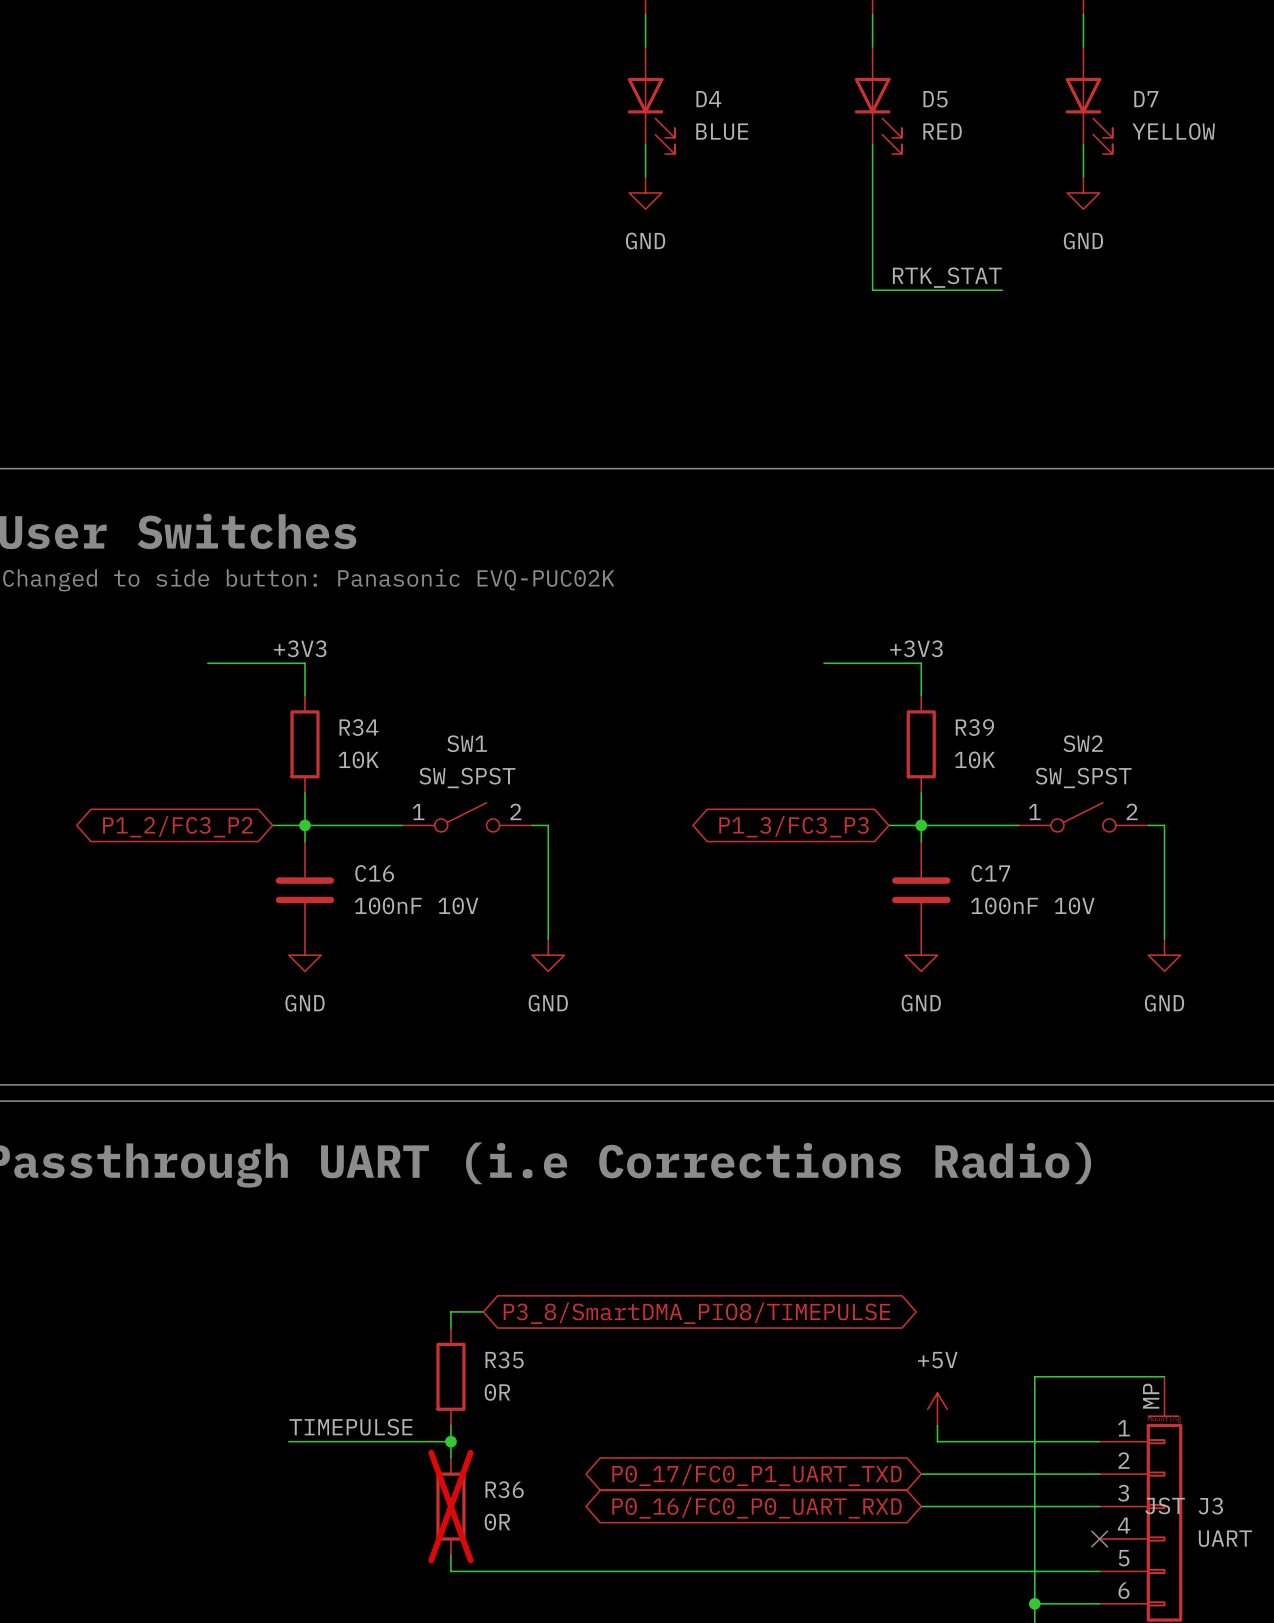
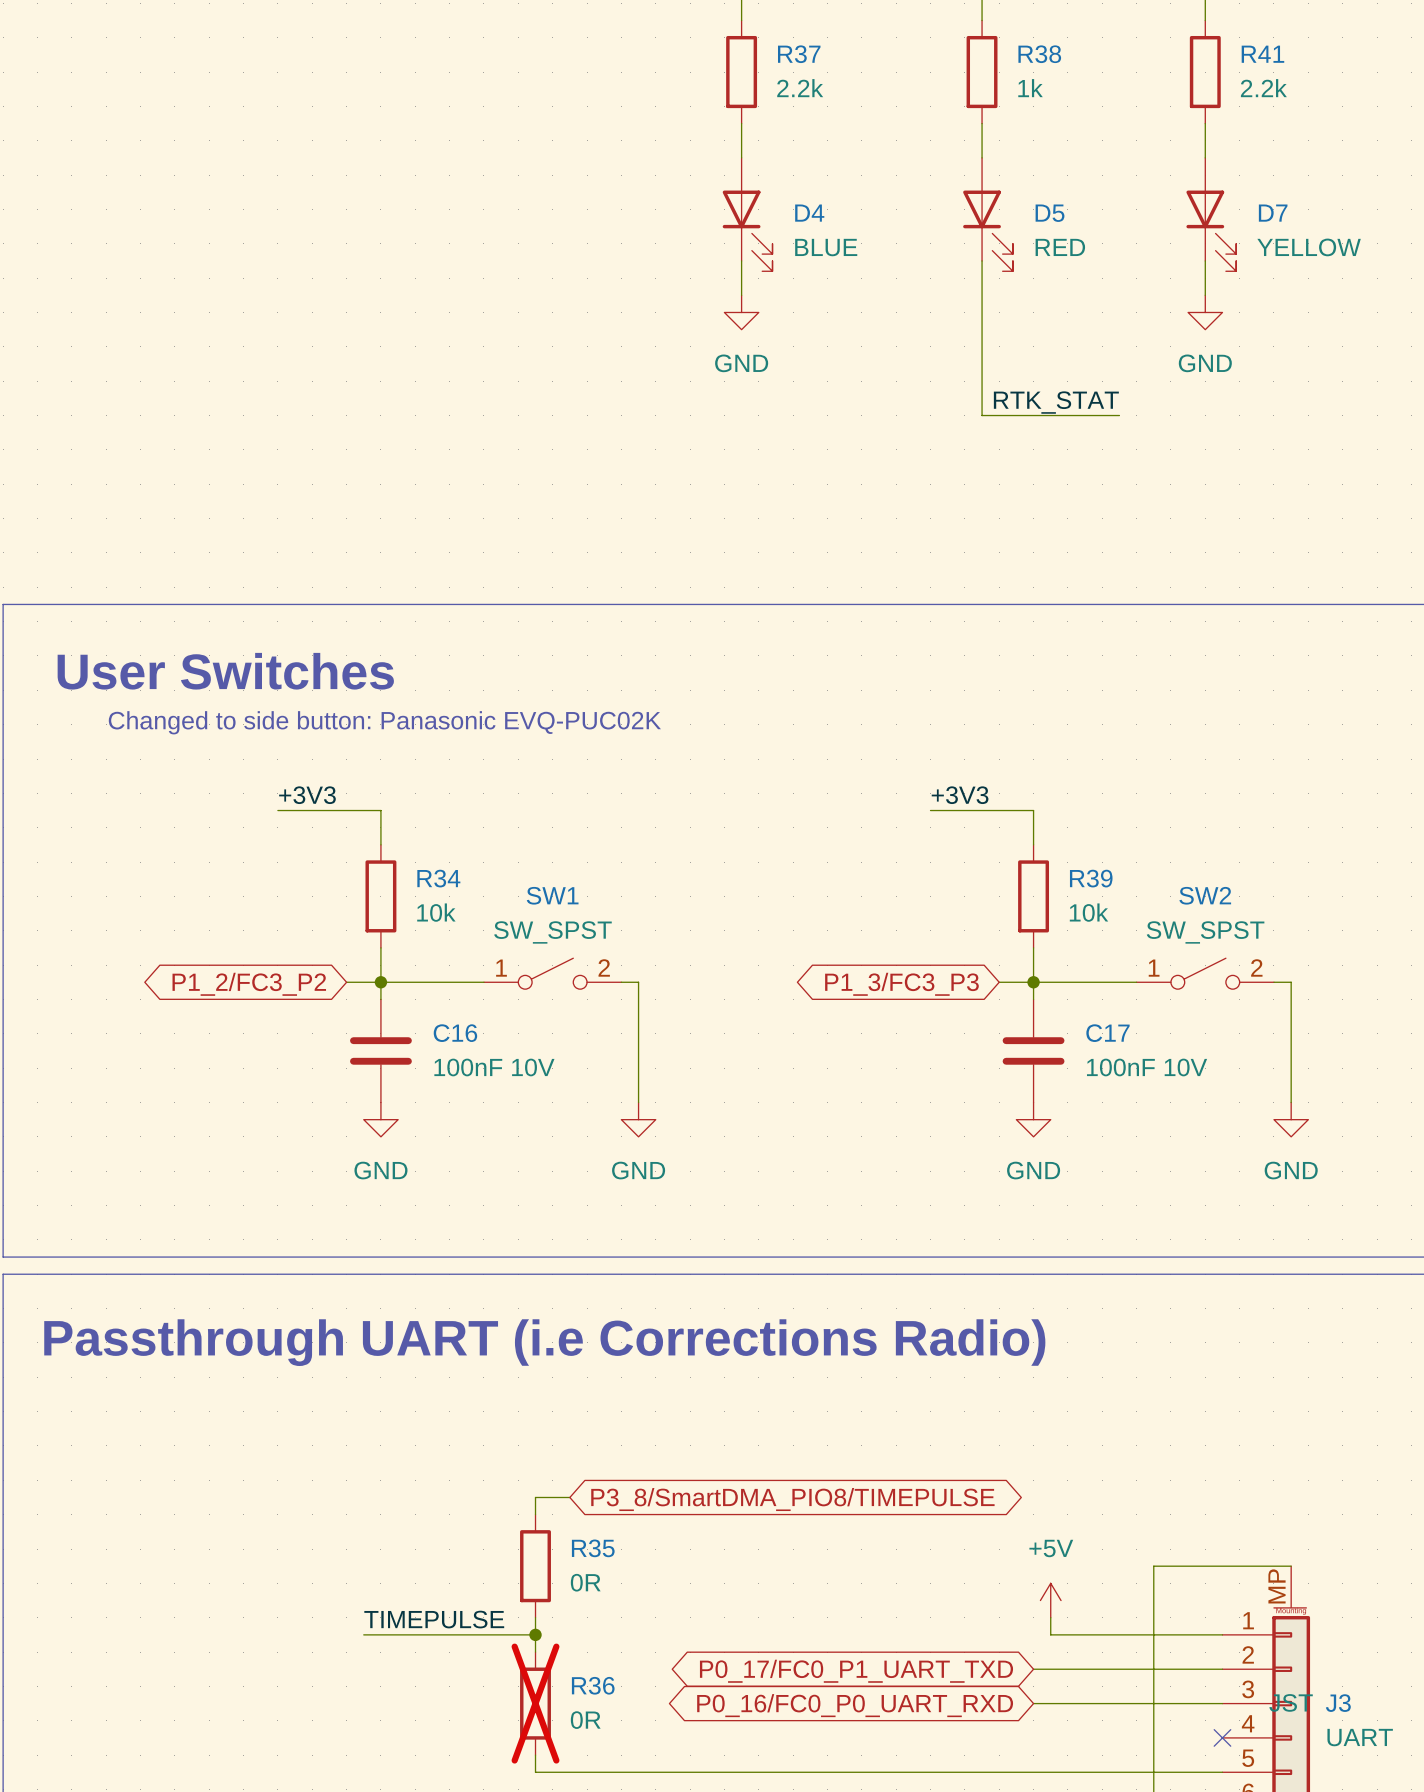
label position: +3V3 (300, 648) -> +3V3 (307, 795)
label position: +3V3 (916, 648) -> +3V3 (960, 795)
R34 value: 10K (358, 759) -> 10k (436, 912)
R39 value: 10K (974, 759) -> 10k (1089, 912)

